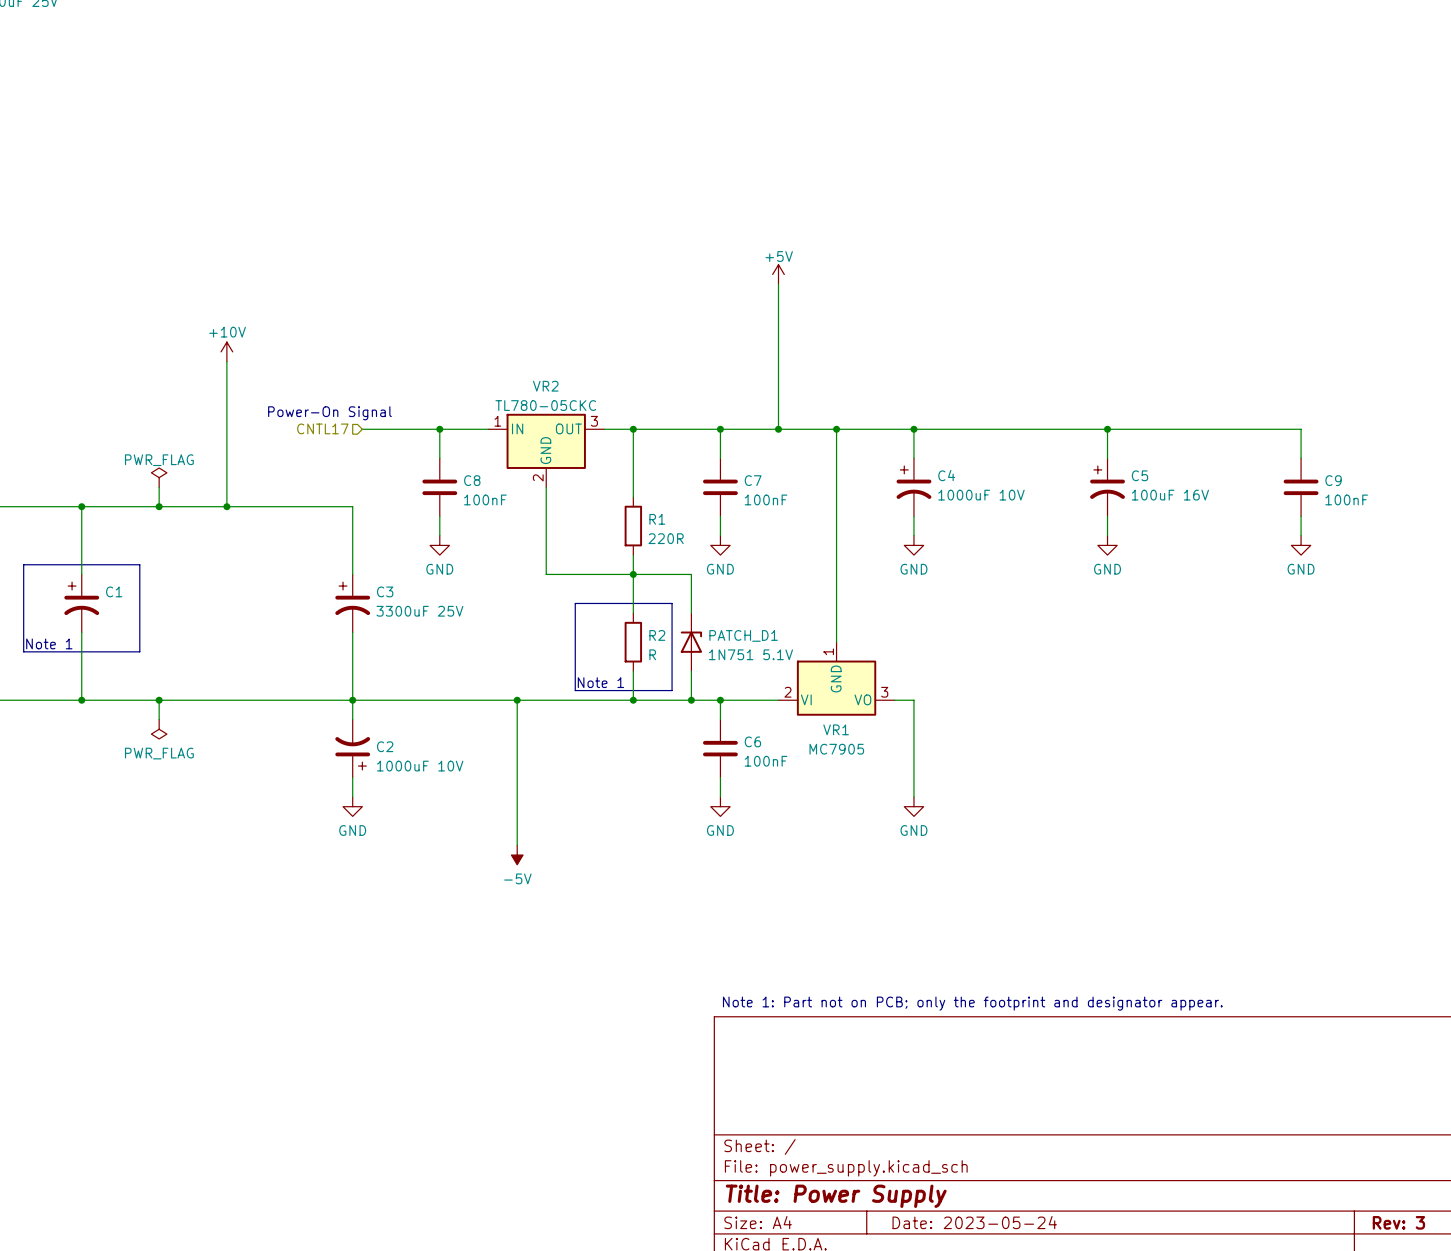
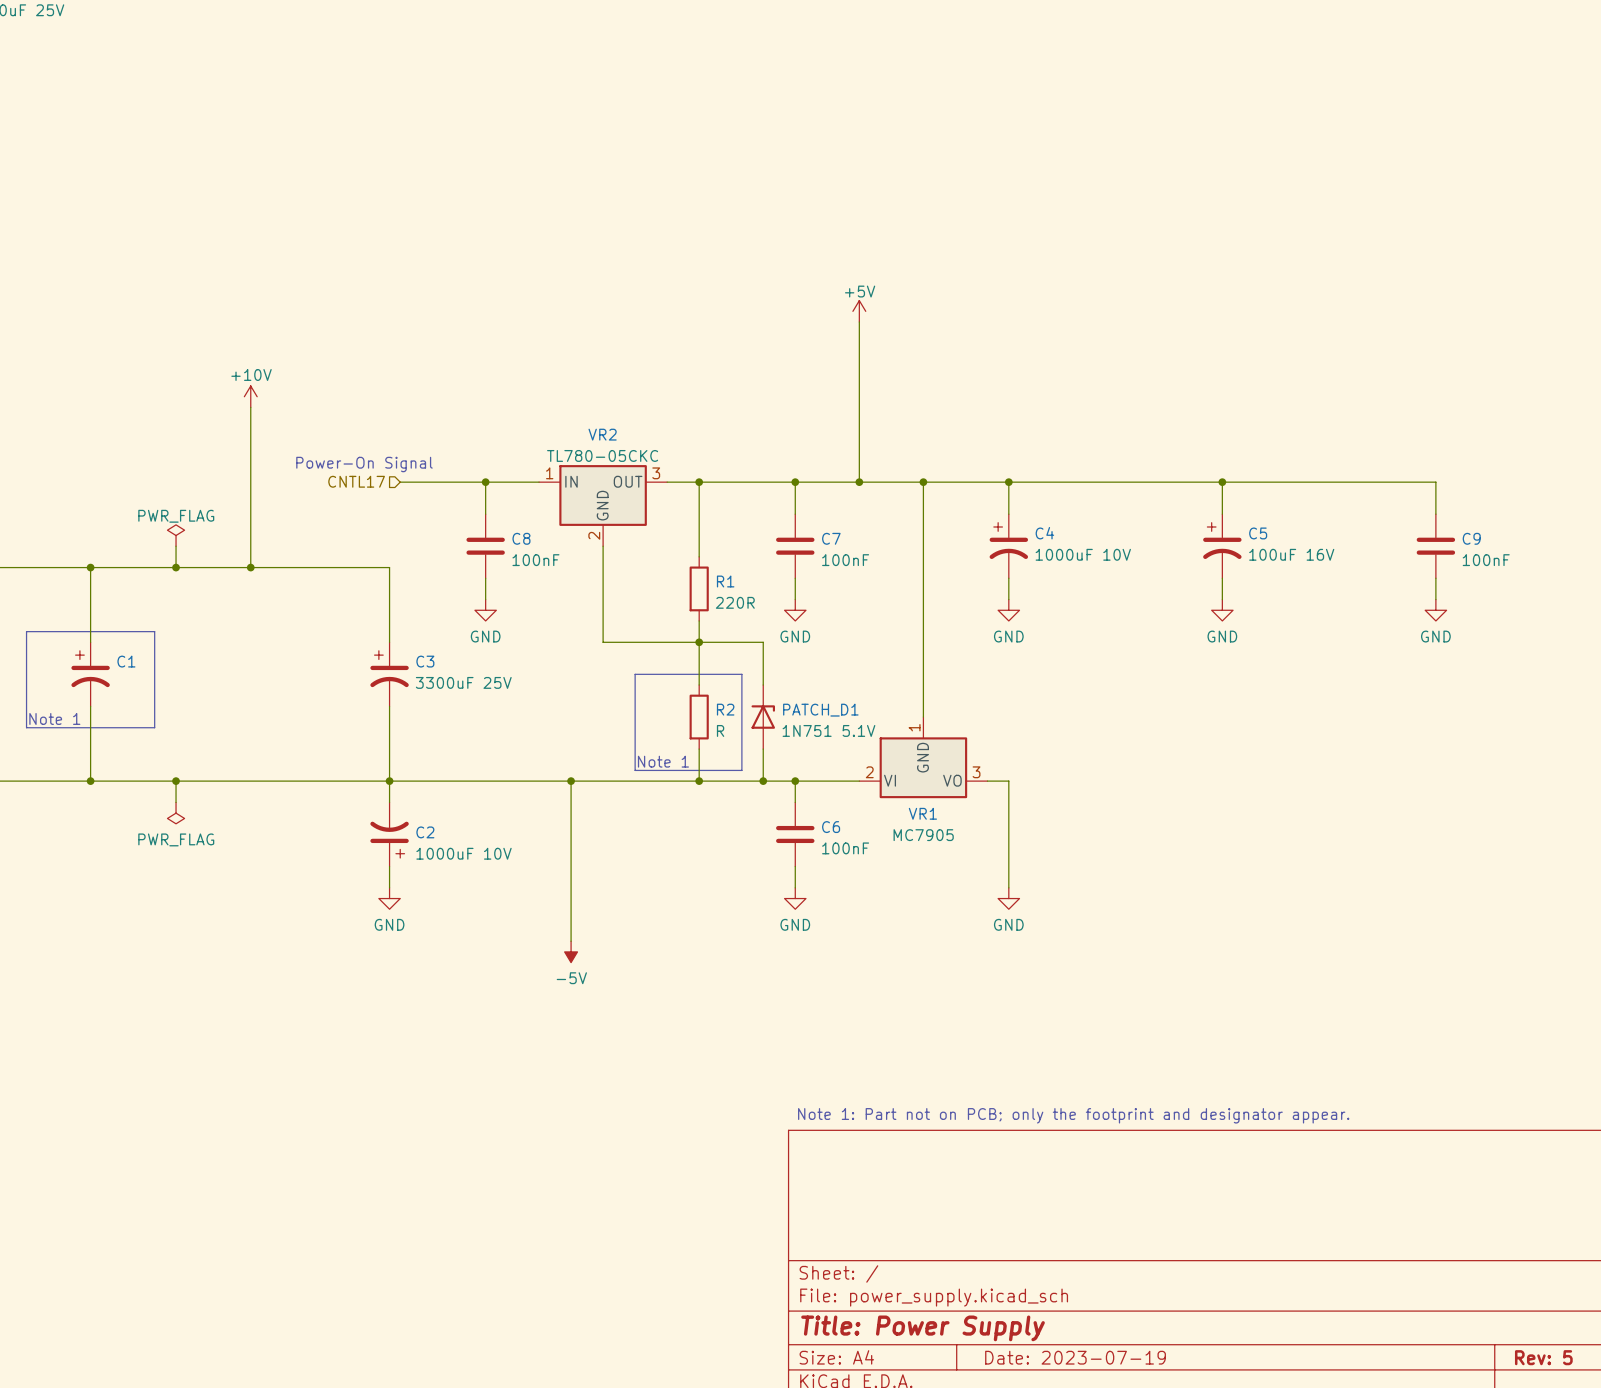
title block: Date: 2023-05-24 (974, 1222) -> Date: 2023-07-19 (1075, 1357)
title block: Rev: 3 (1398, 1222) -> Rev: 5 (1543, 1357)

